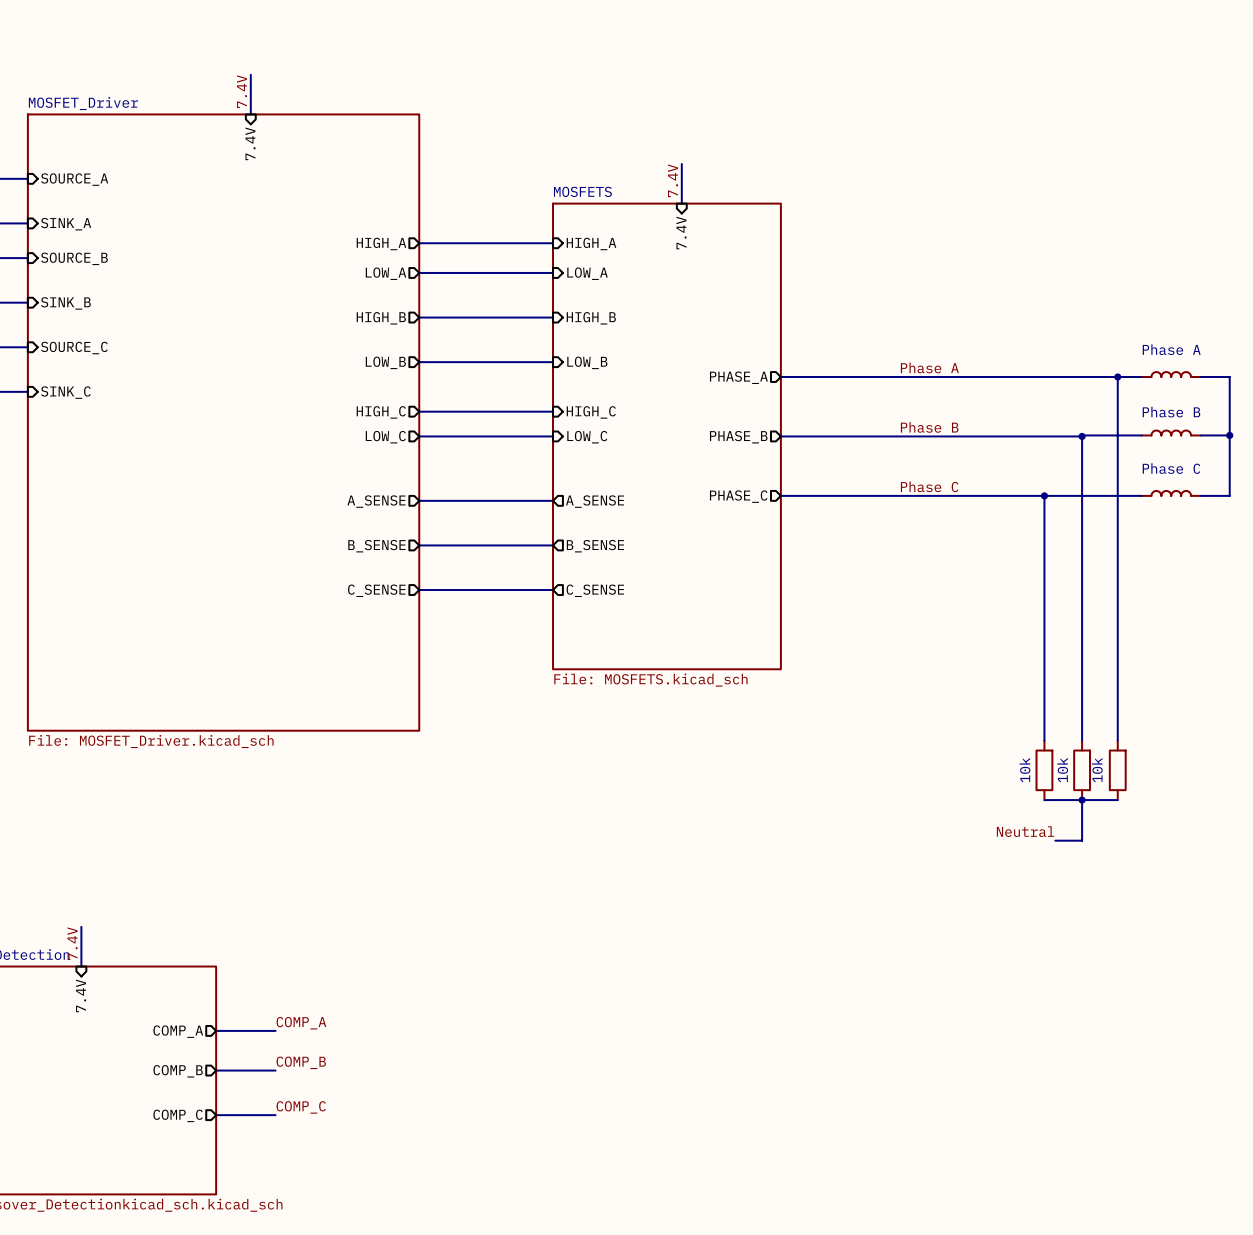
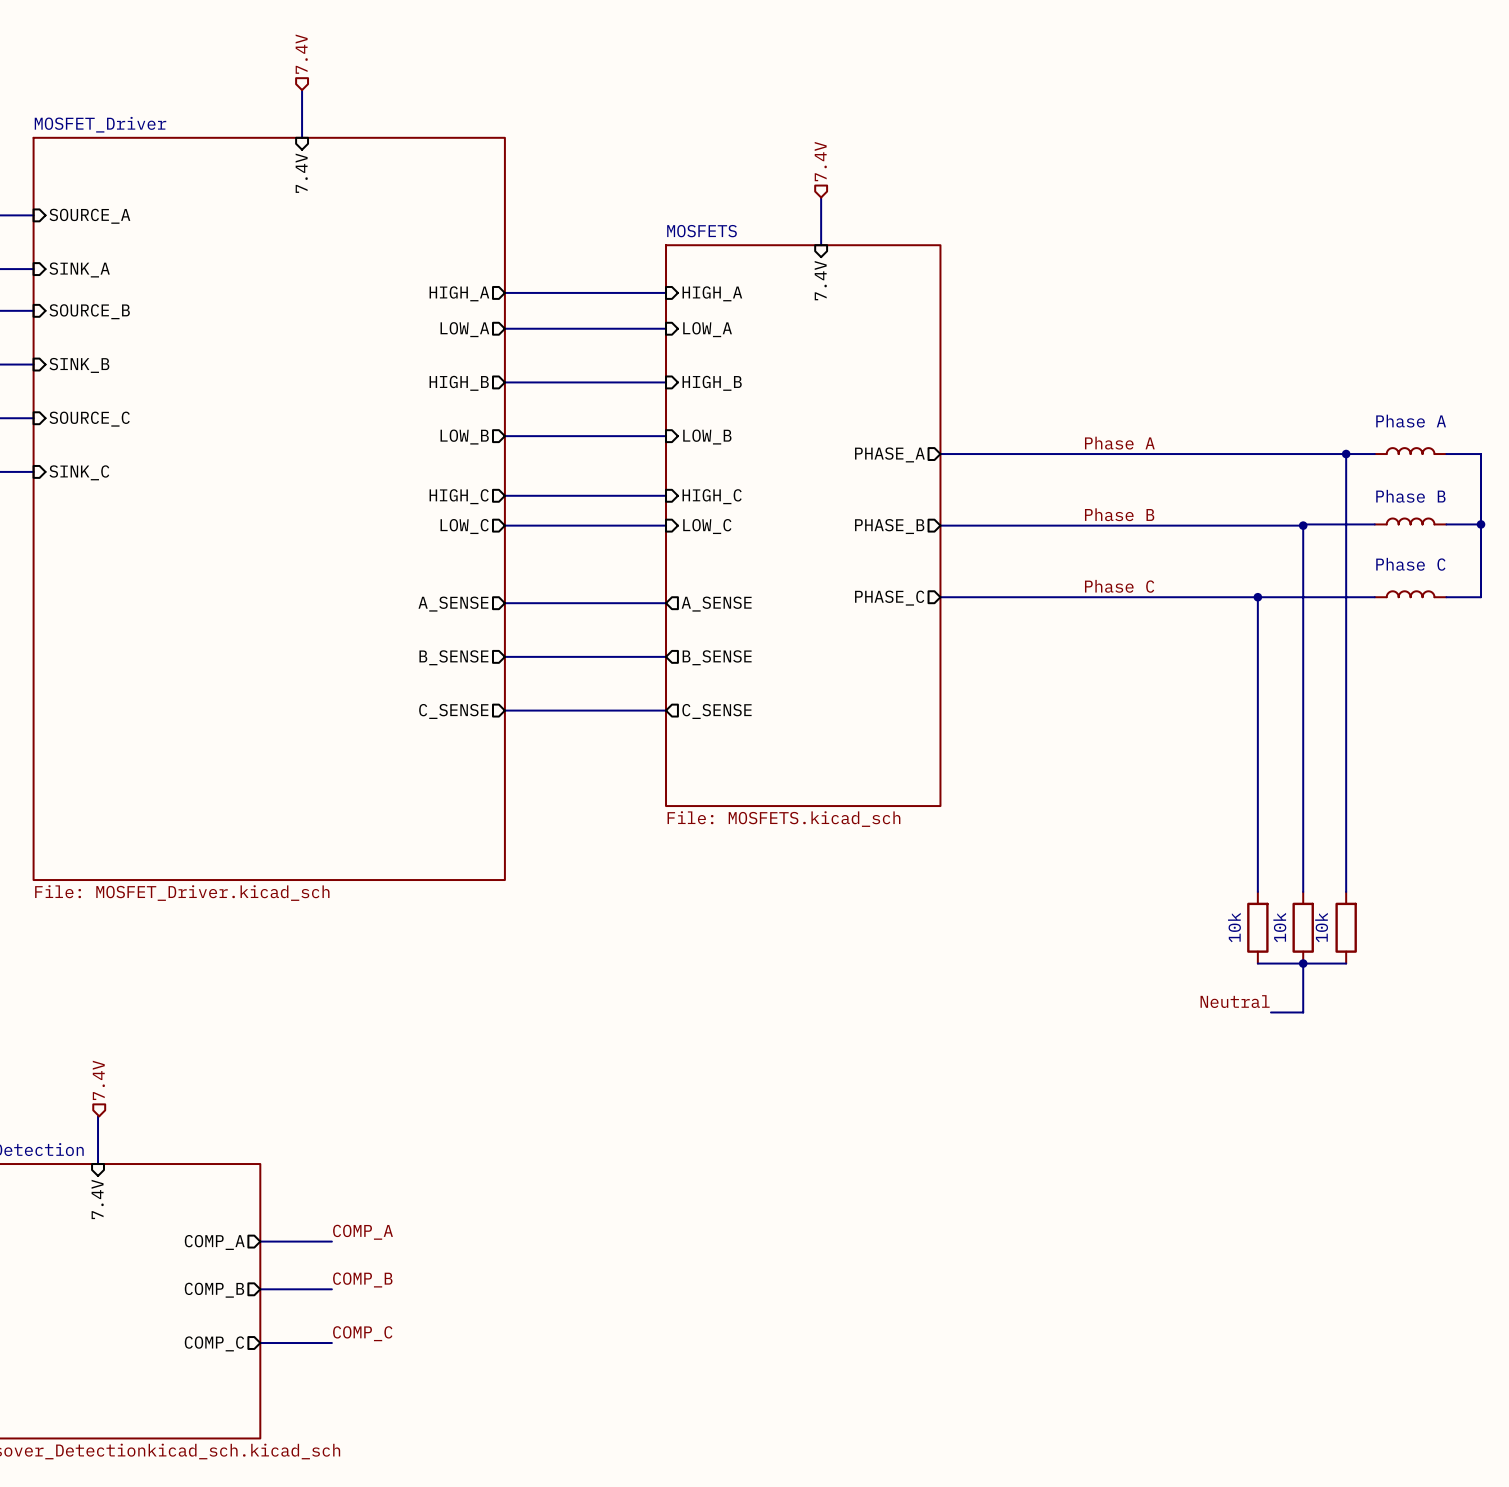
hierarchical label: none -> 7.4V (301, 54)
label: 7.4V (242, 91) -> none
hierarchical label: none -> 7.4V (820, 161)
label: 7.4V (673, 180) -> none
hierarchical label: none -> 7.4V (98, 1080)
label: 7.4V (72, 943) -> none

